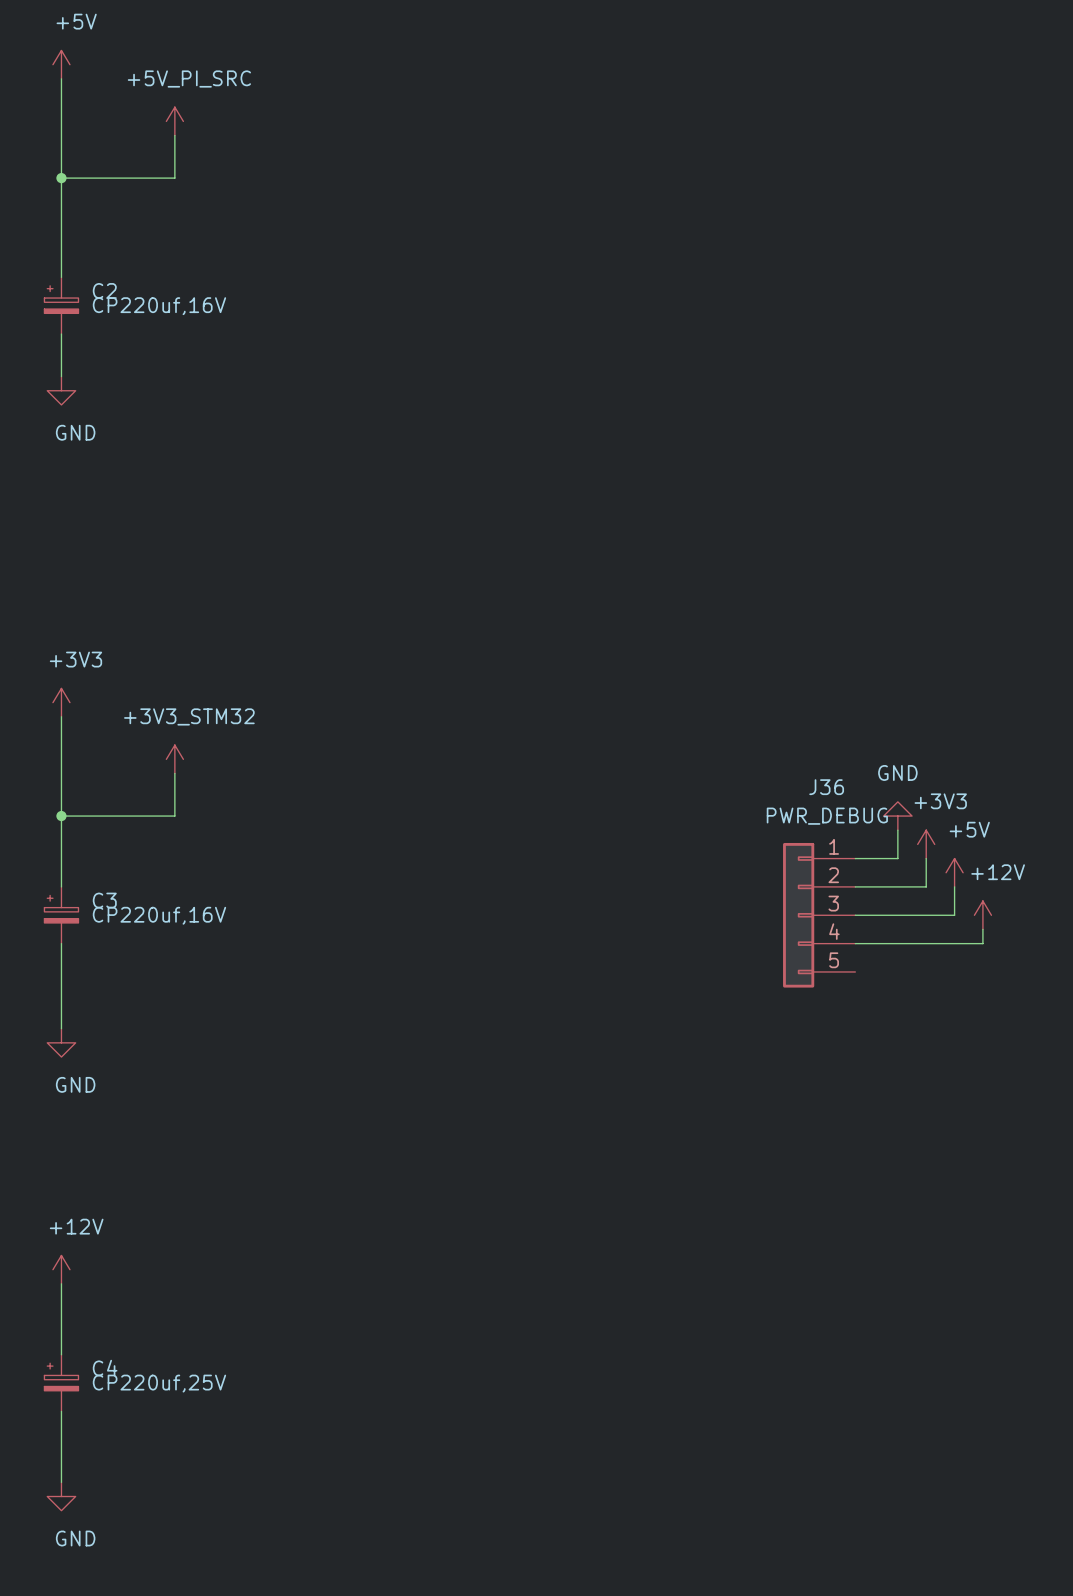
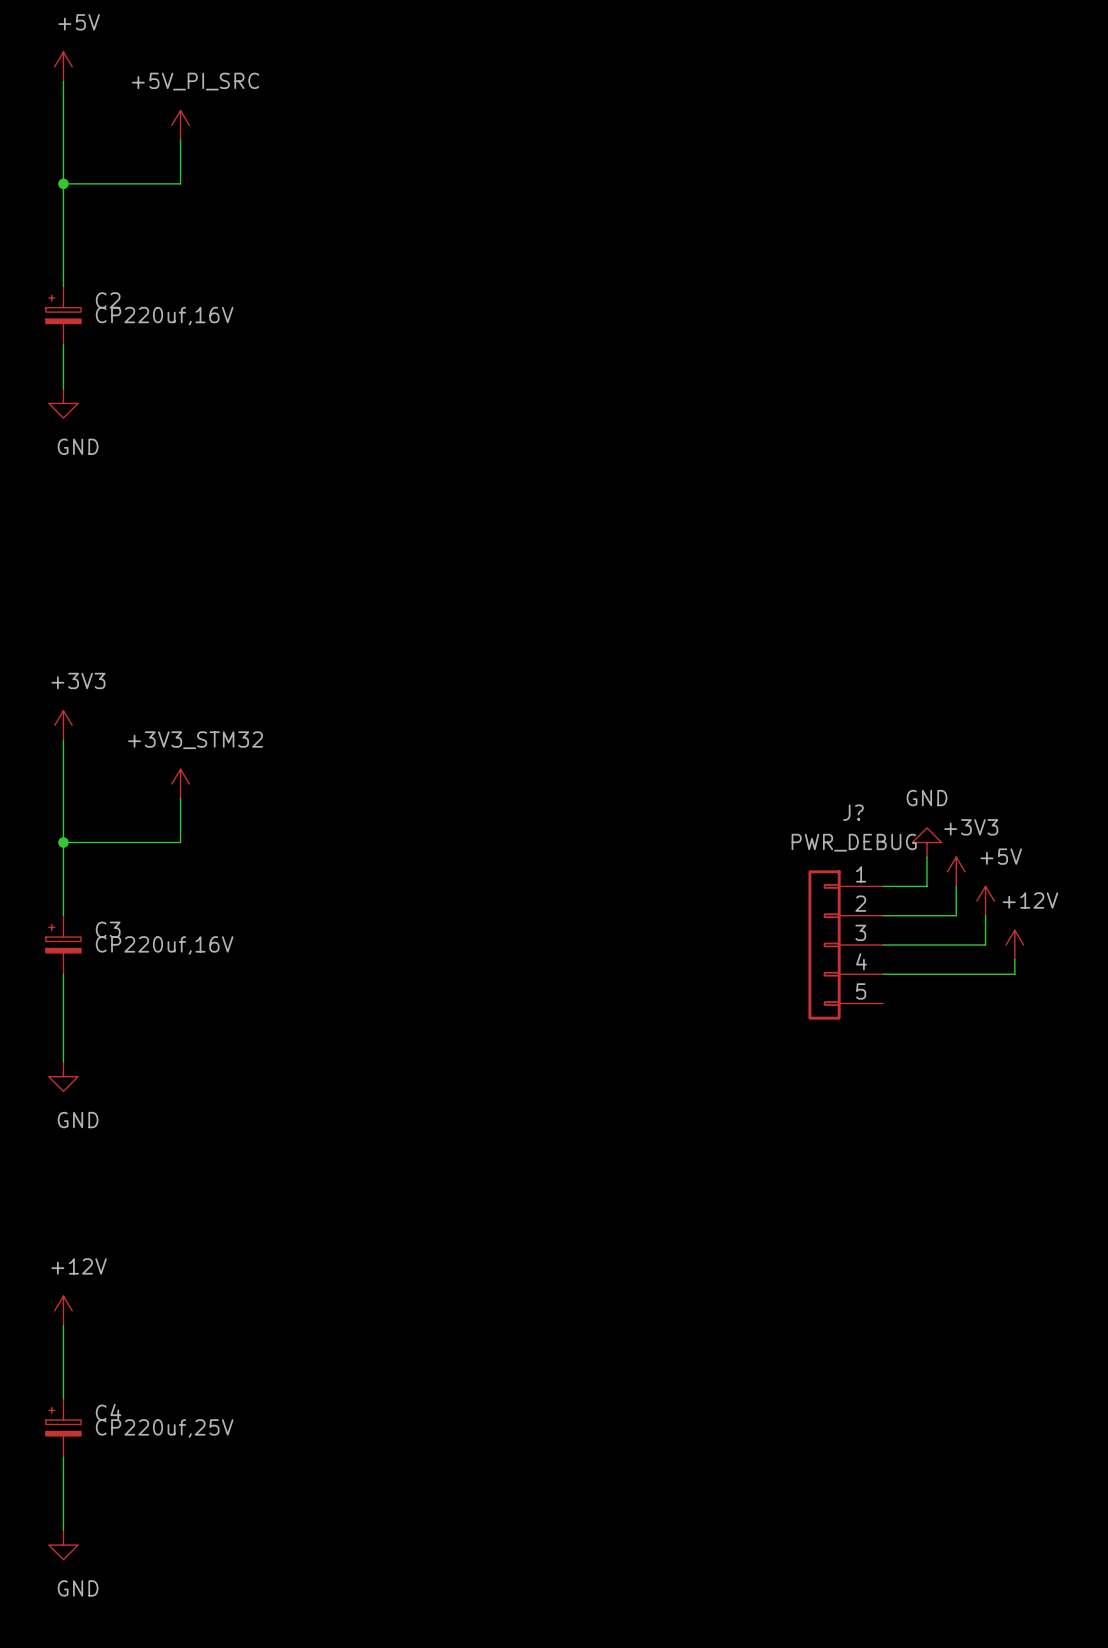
J36 name: J36 (826, 787) -> J? (853, 812)

